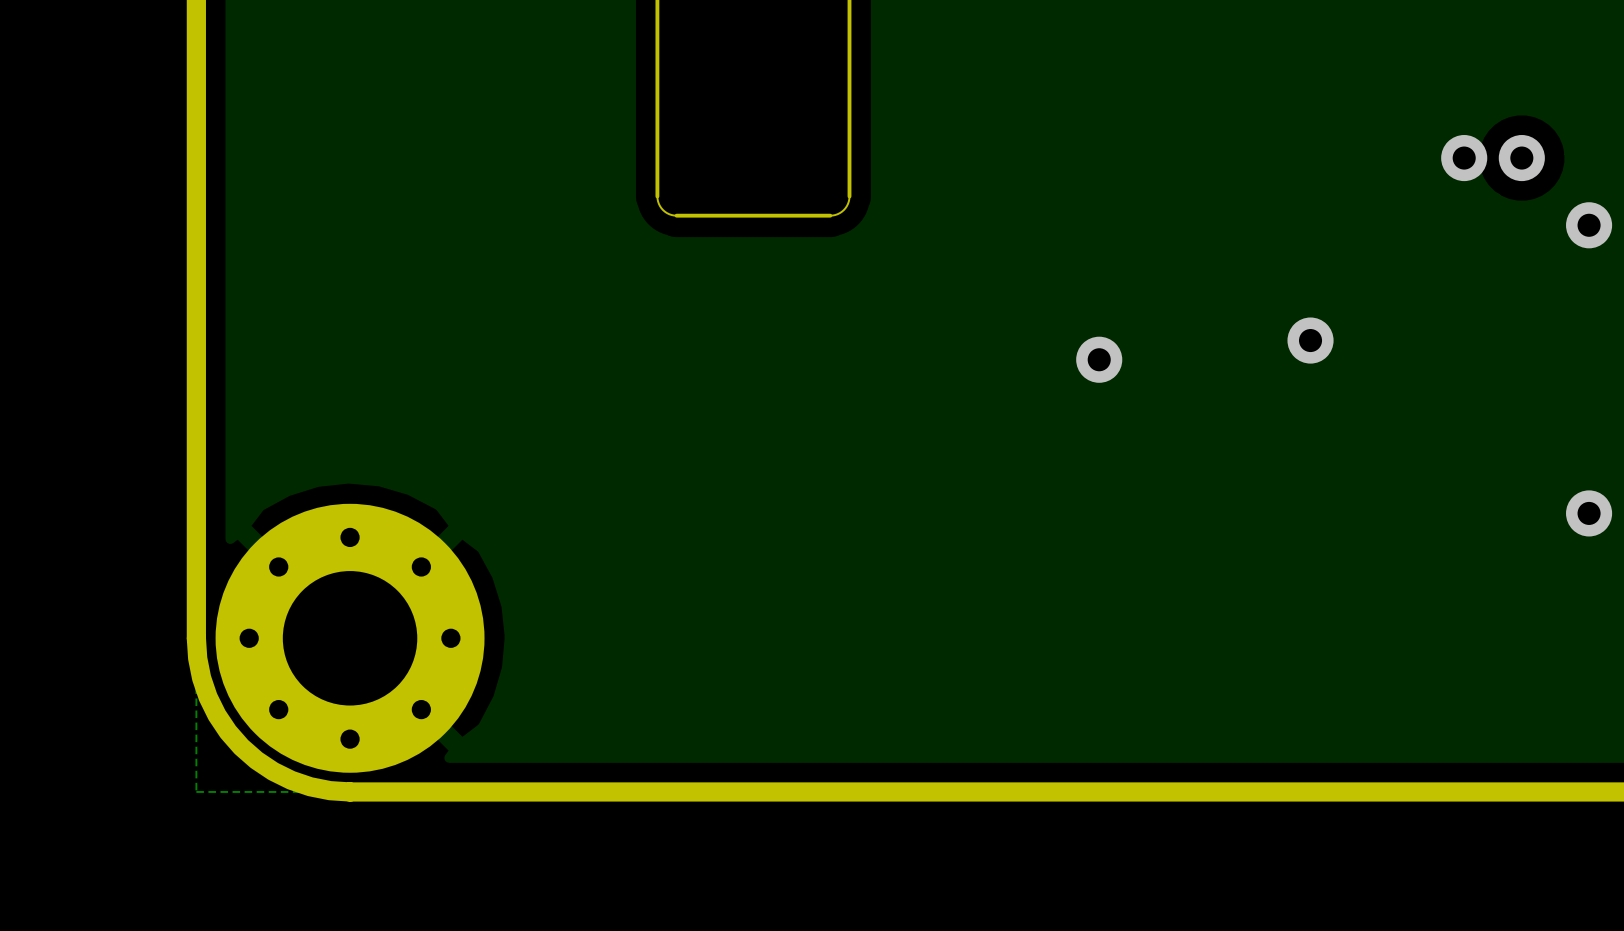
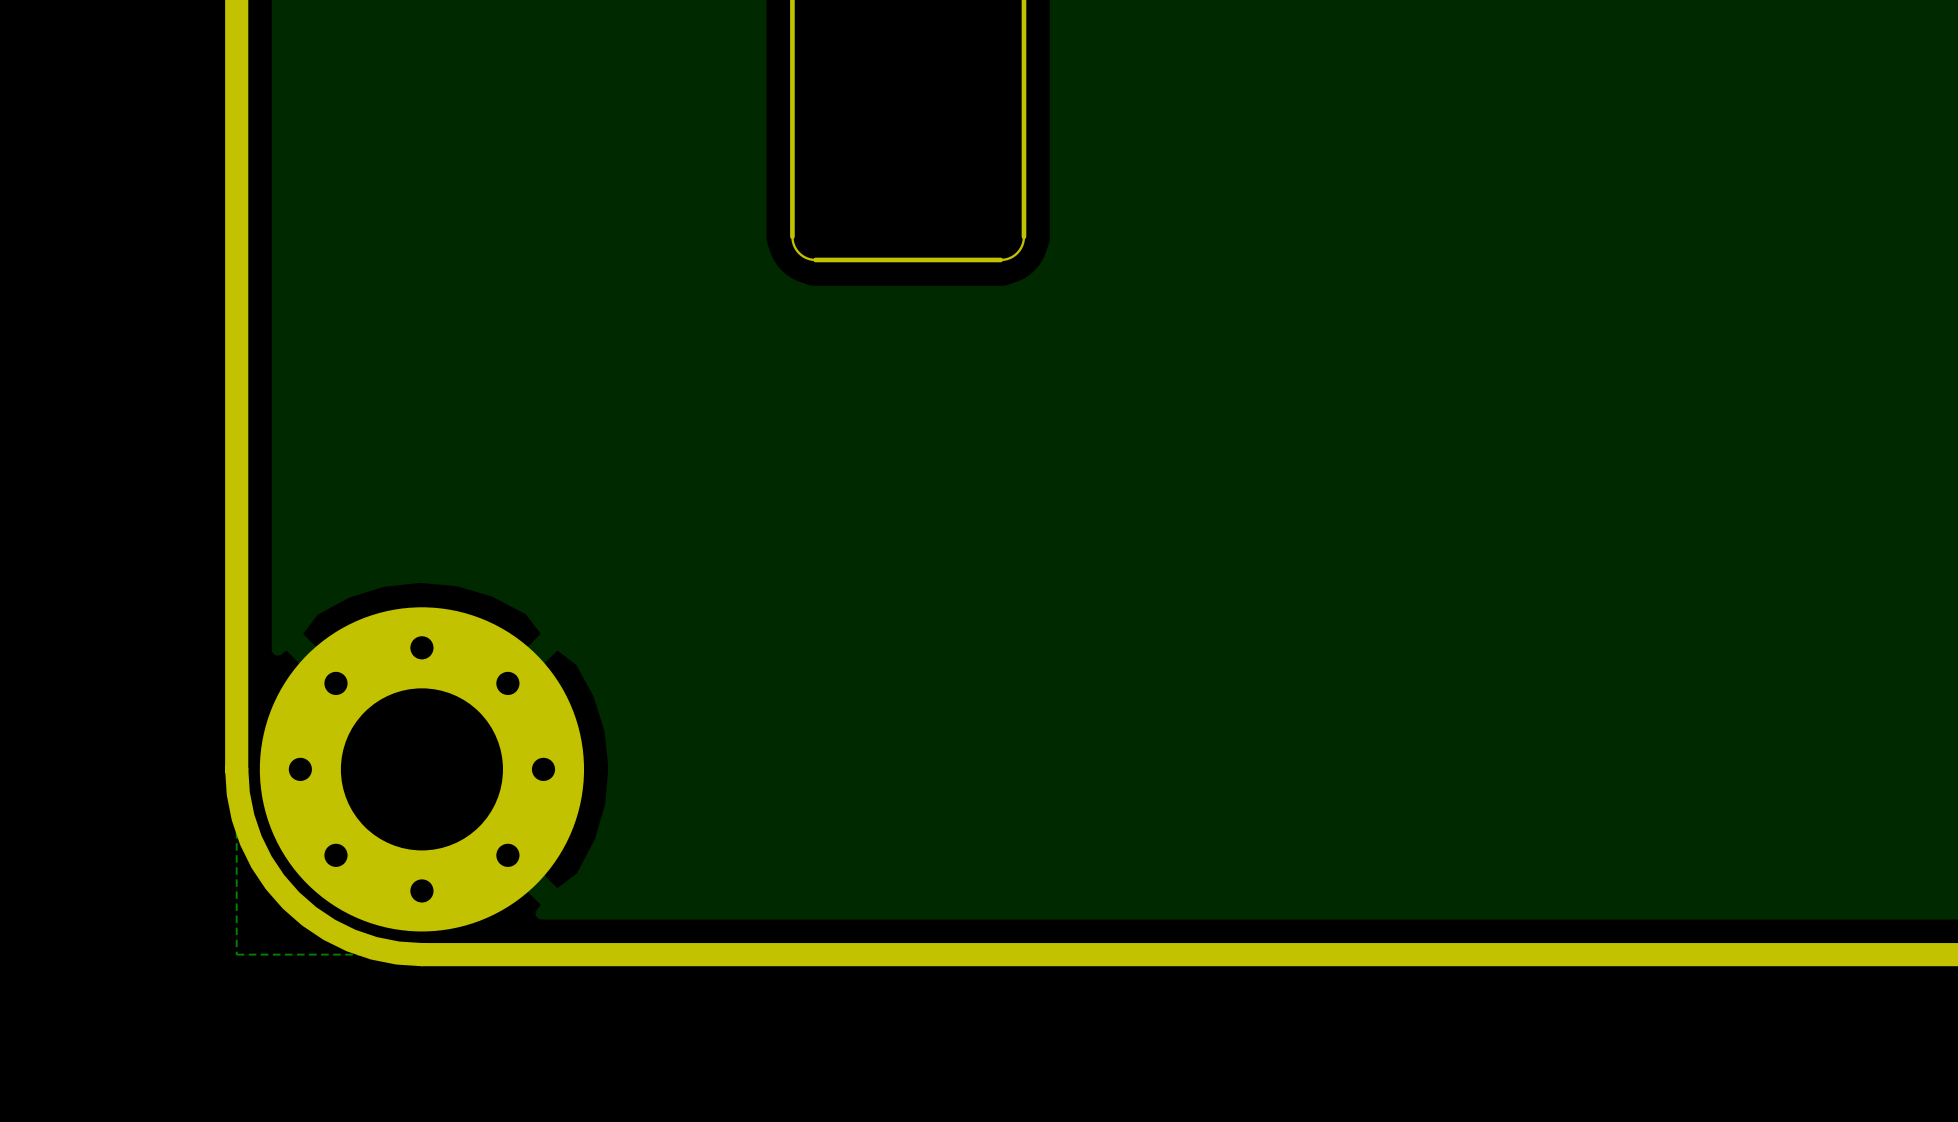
via: (1464, 158) -> none
via: (1521, 158) -> none
via: (1589, 225) -> none
via: (1310, 340) -> none
via: (1099, 359) -> none
via: (1589, 513) -> none

